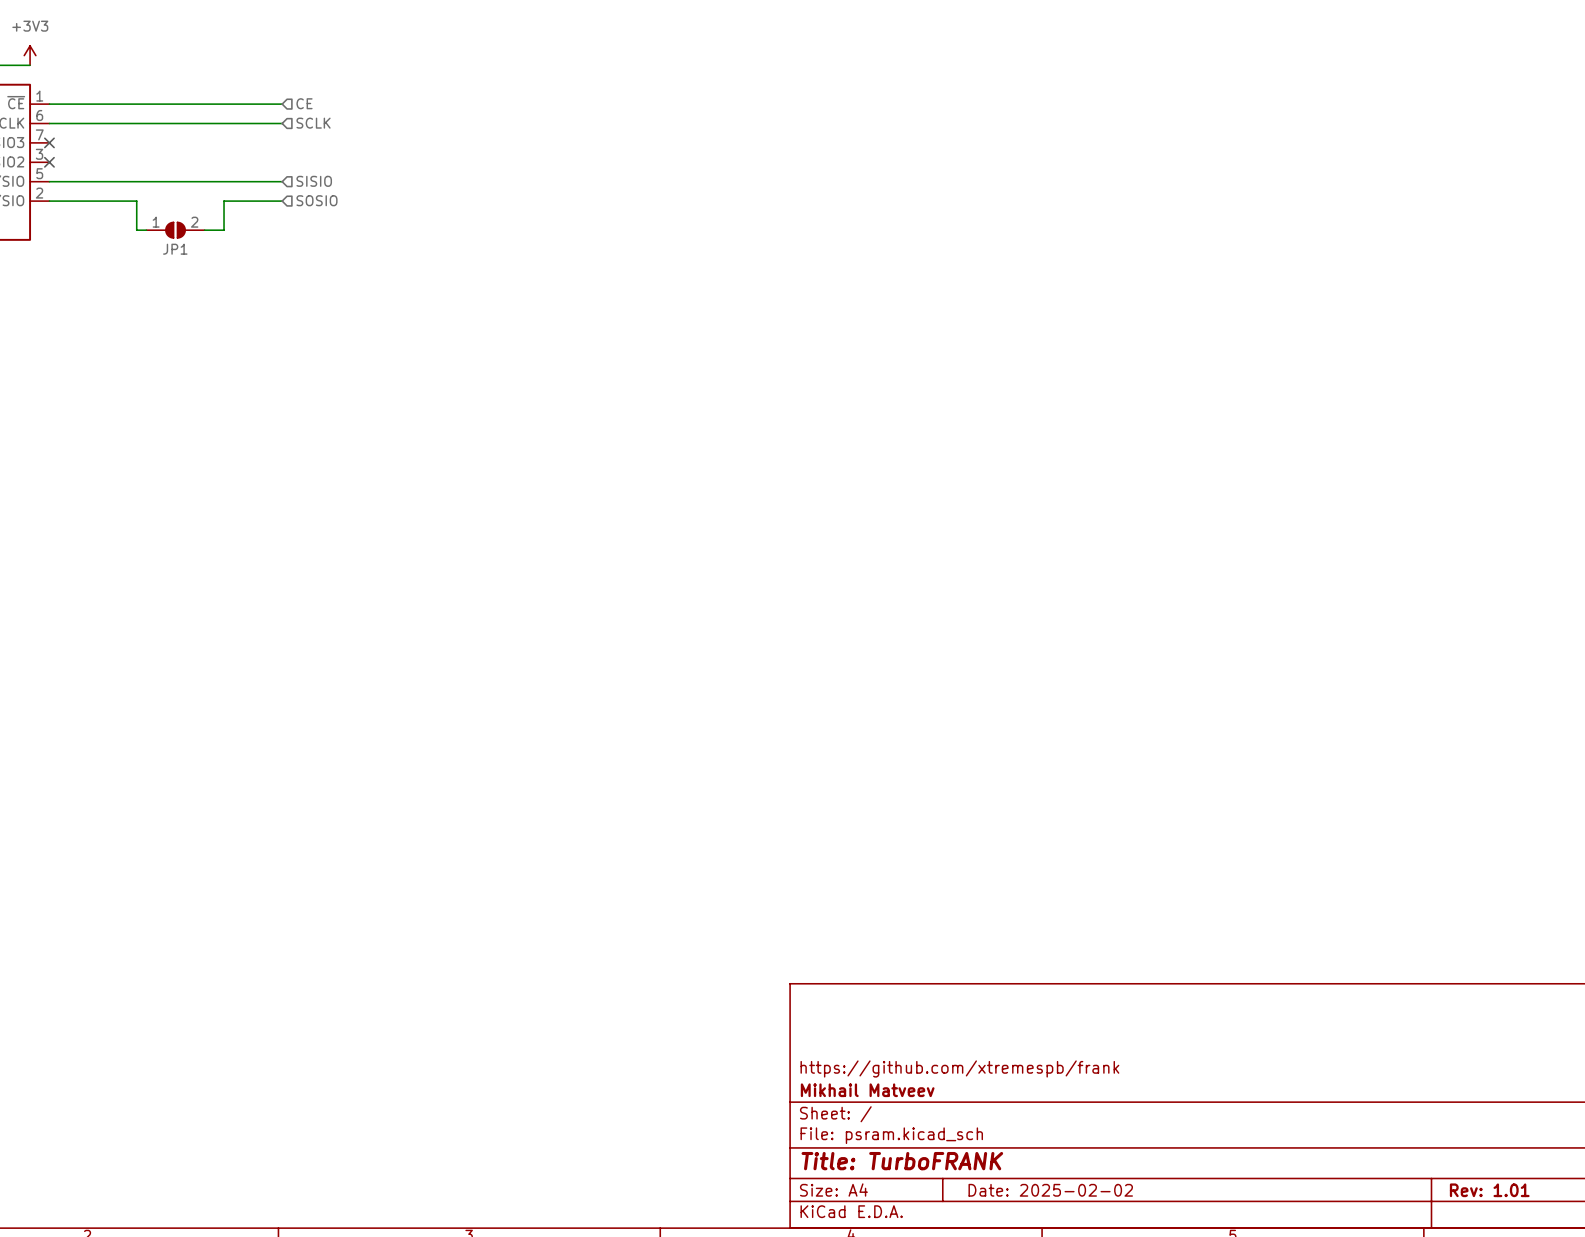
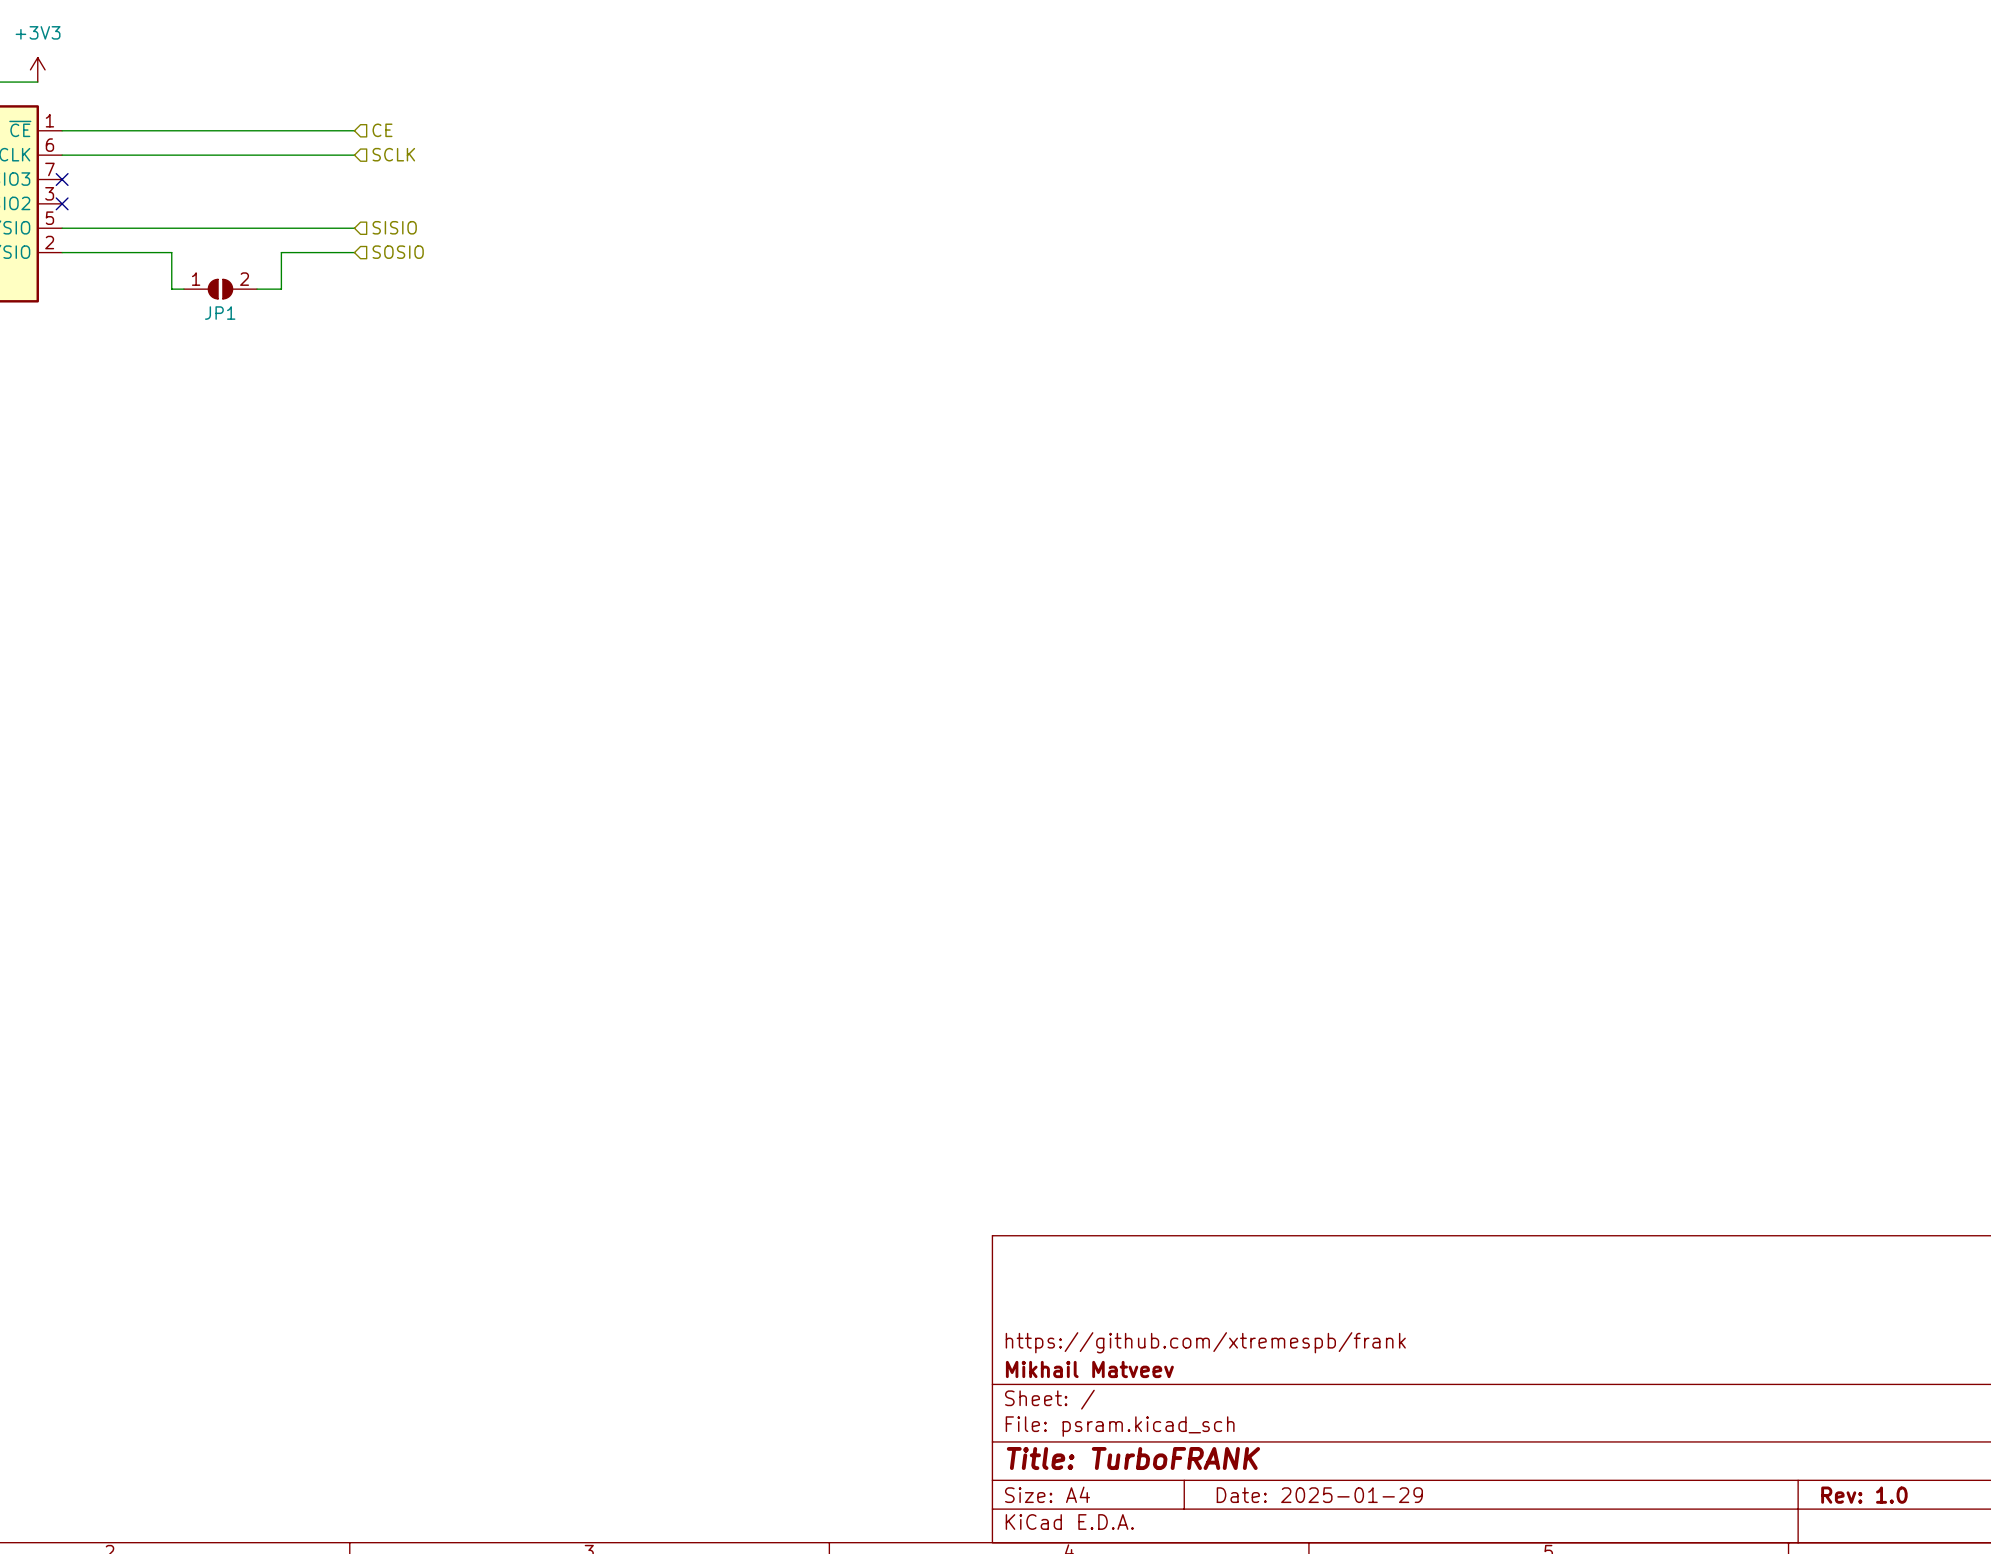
title block: Date: 2025-02-02 (1050, 1190) -> Date: 2025-01-29 (1319, 1495)
title block: Rev: 1.01 (1489, 1190) -> Rev: 1.0 (1864, 1495)

